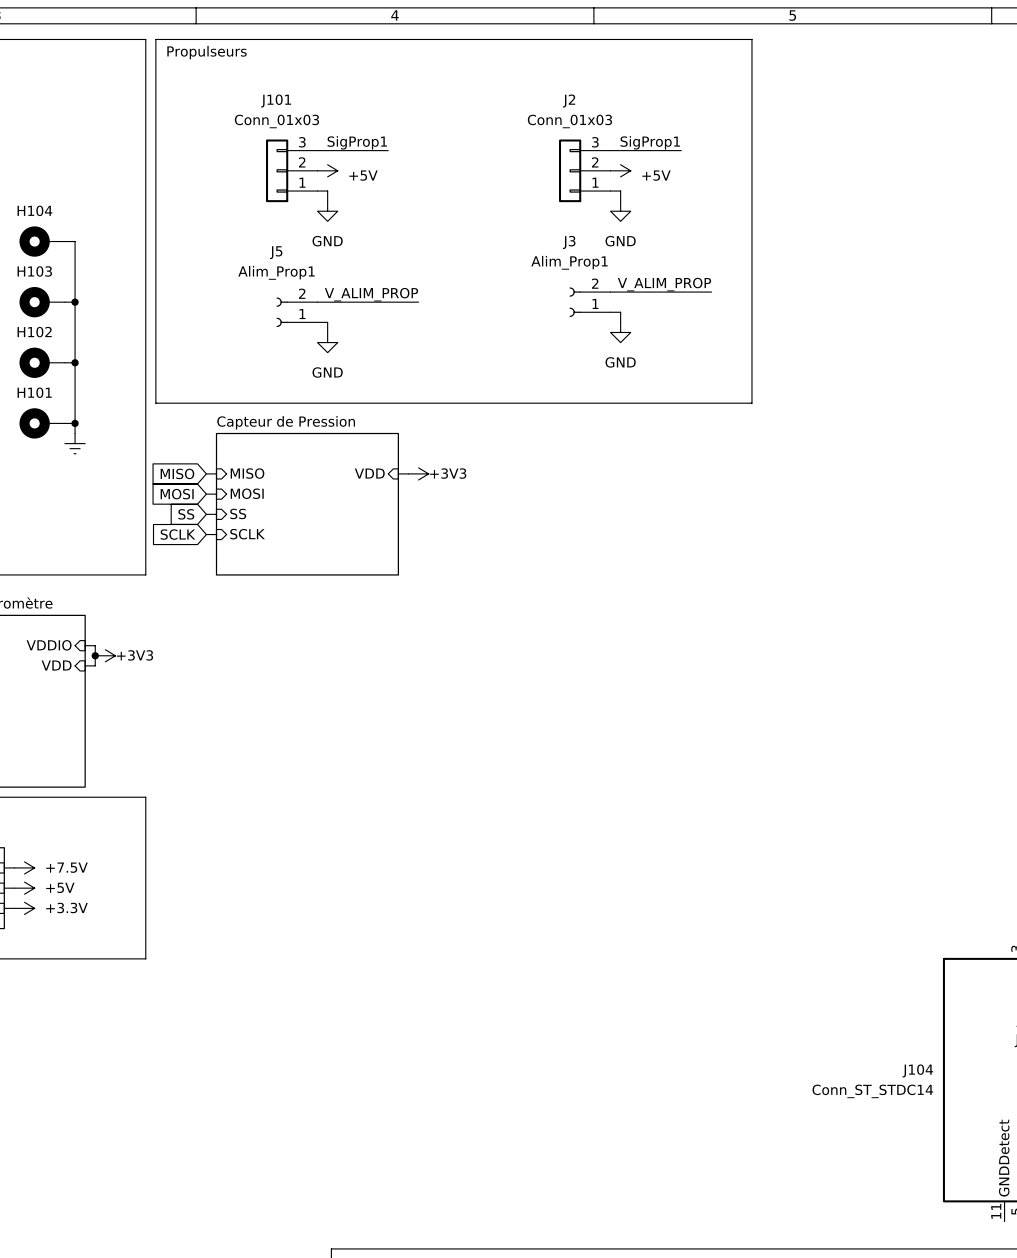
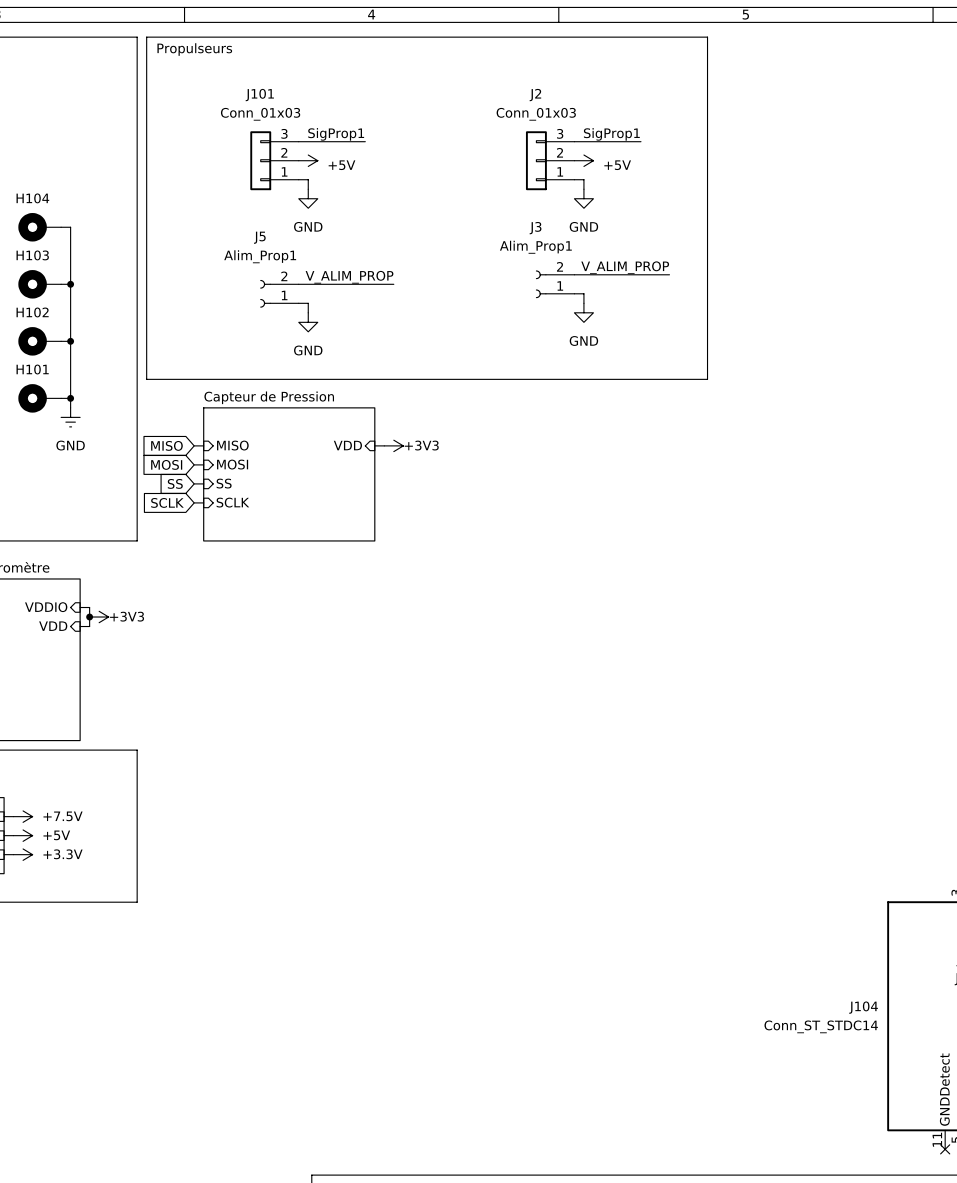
power symbol text: none -> GND (70, 445)
no-connect mark: none -> (945, 1149)

